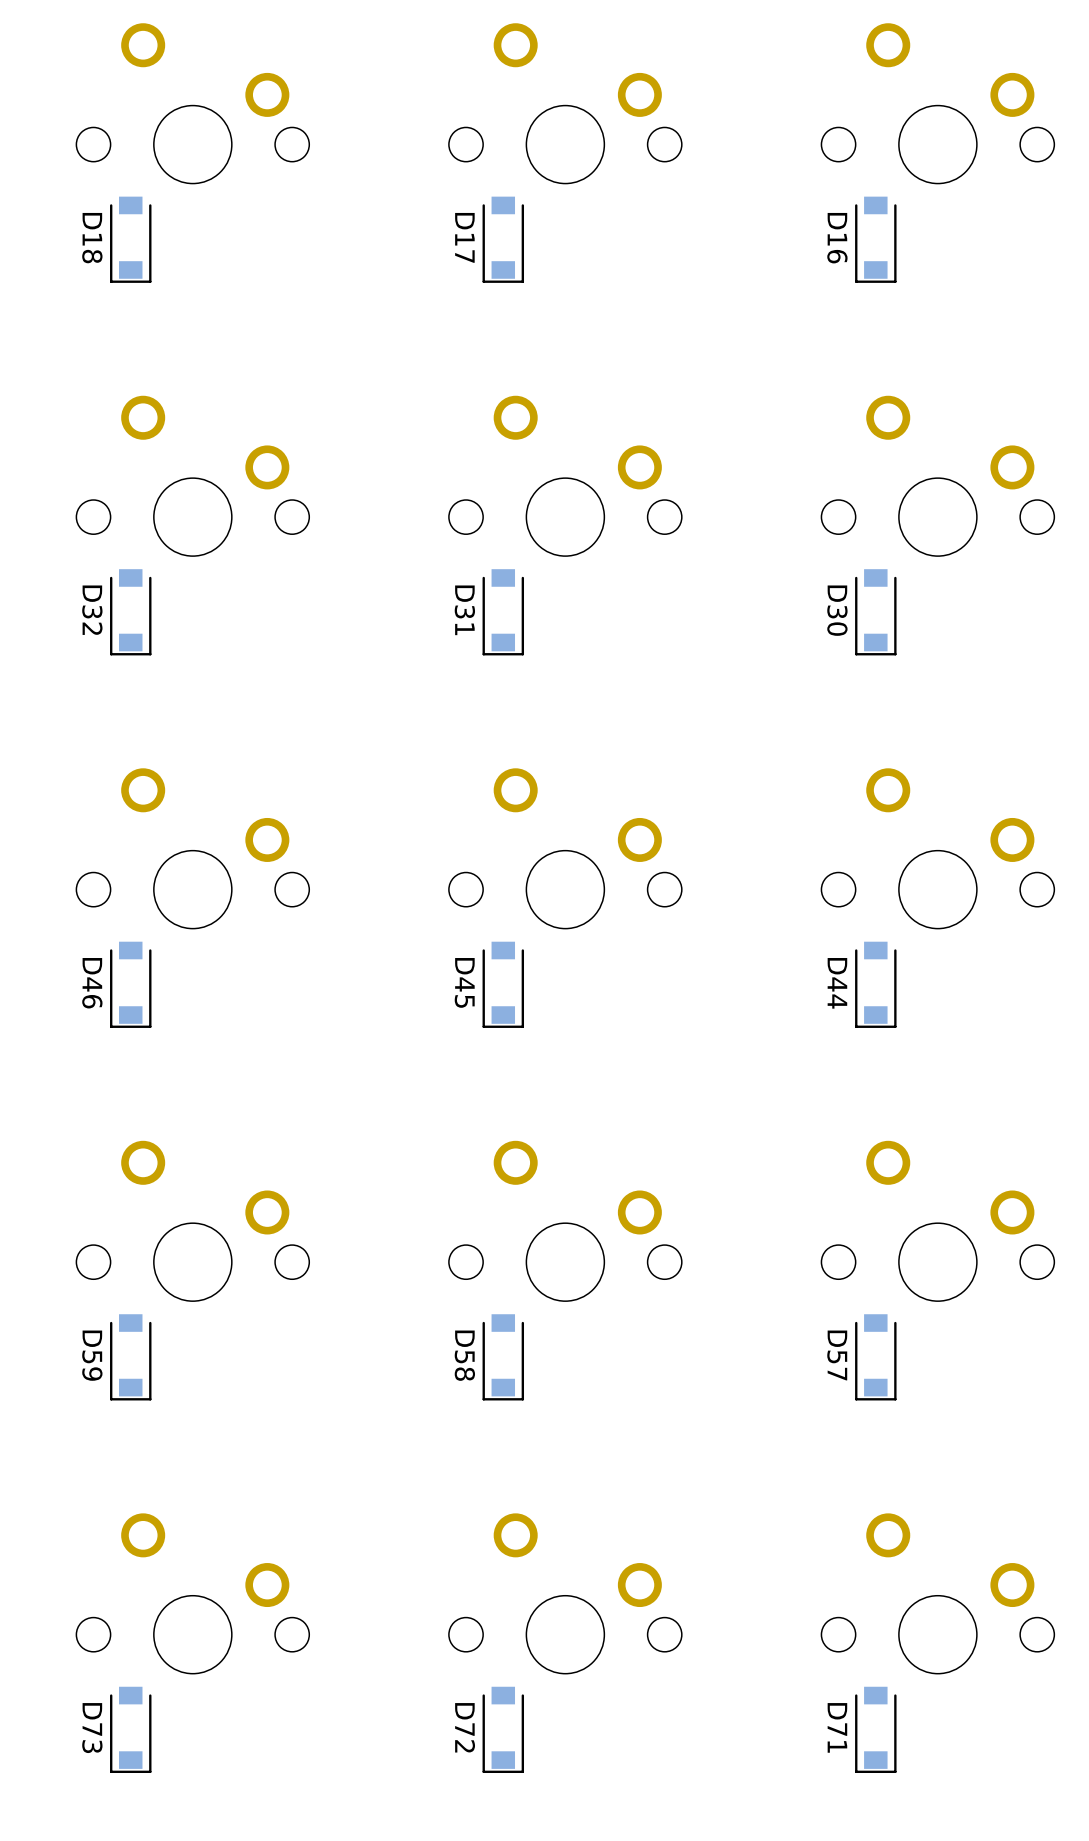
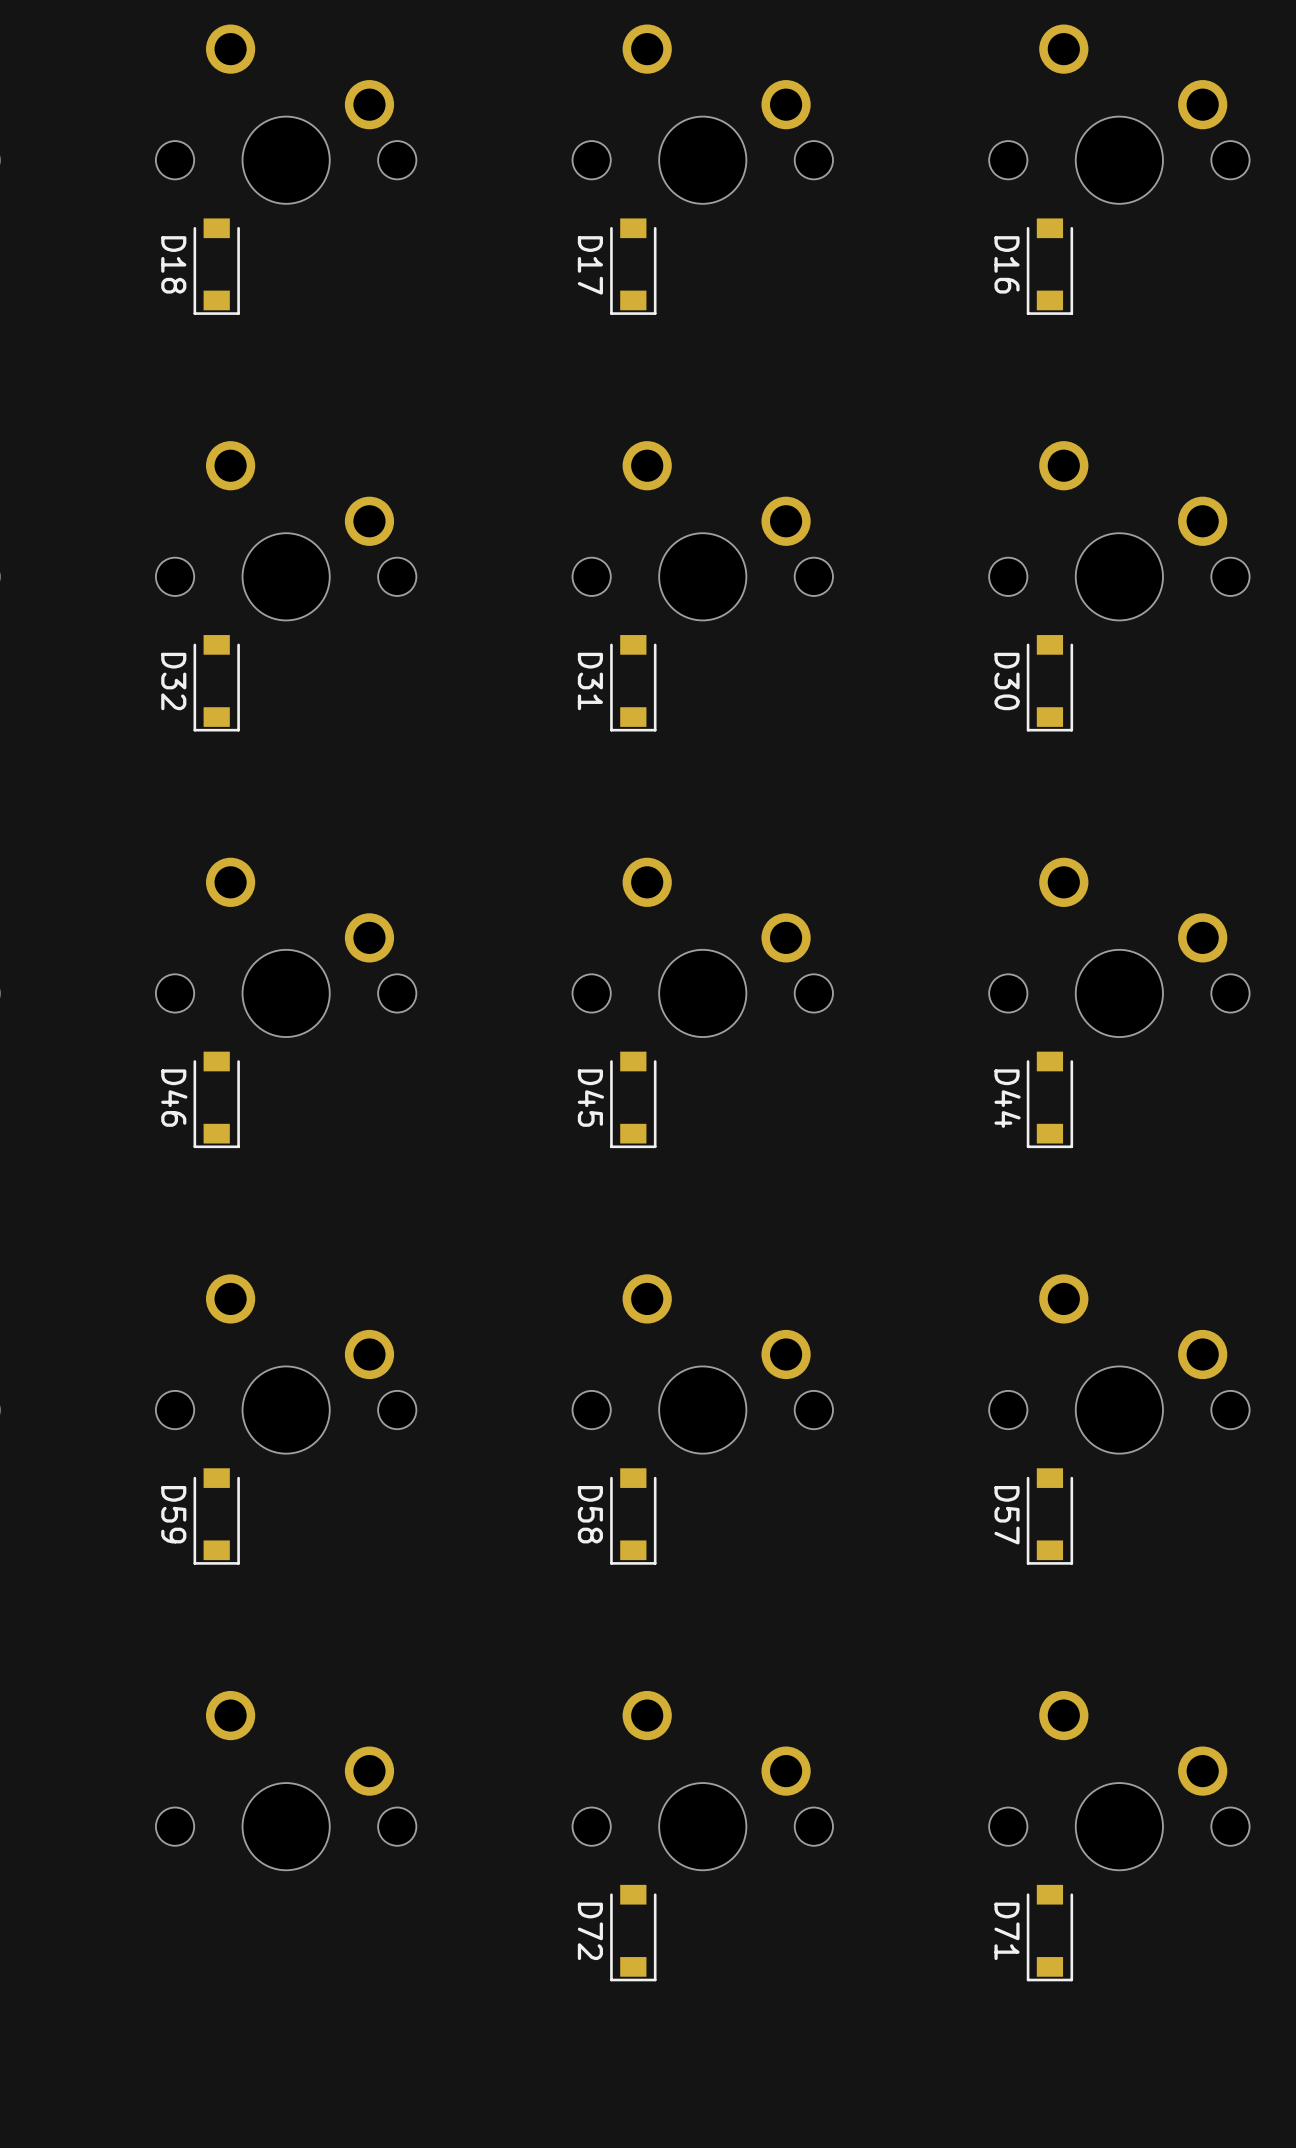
D73: (130, 1729) -> none

